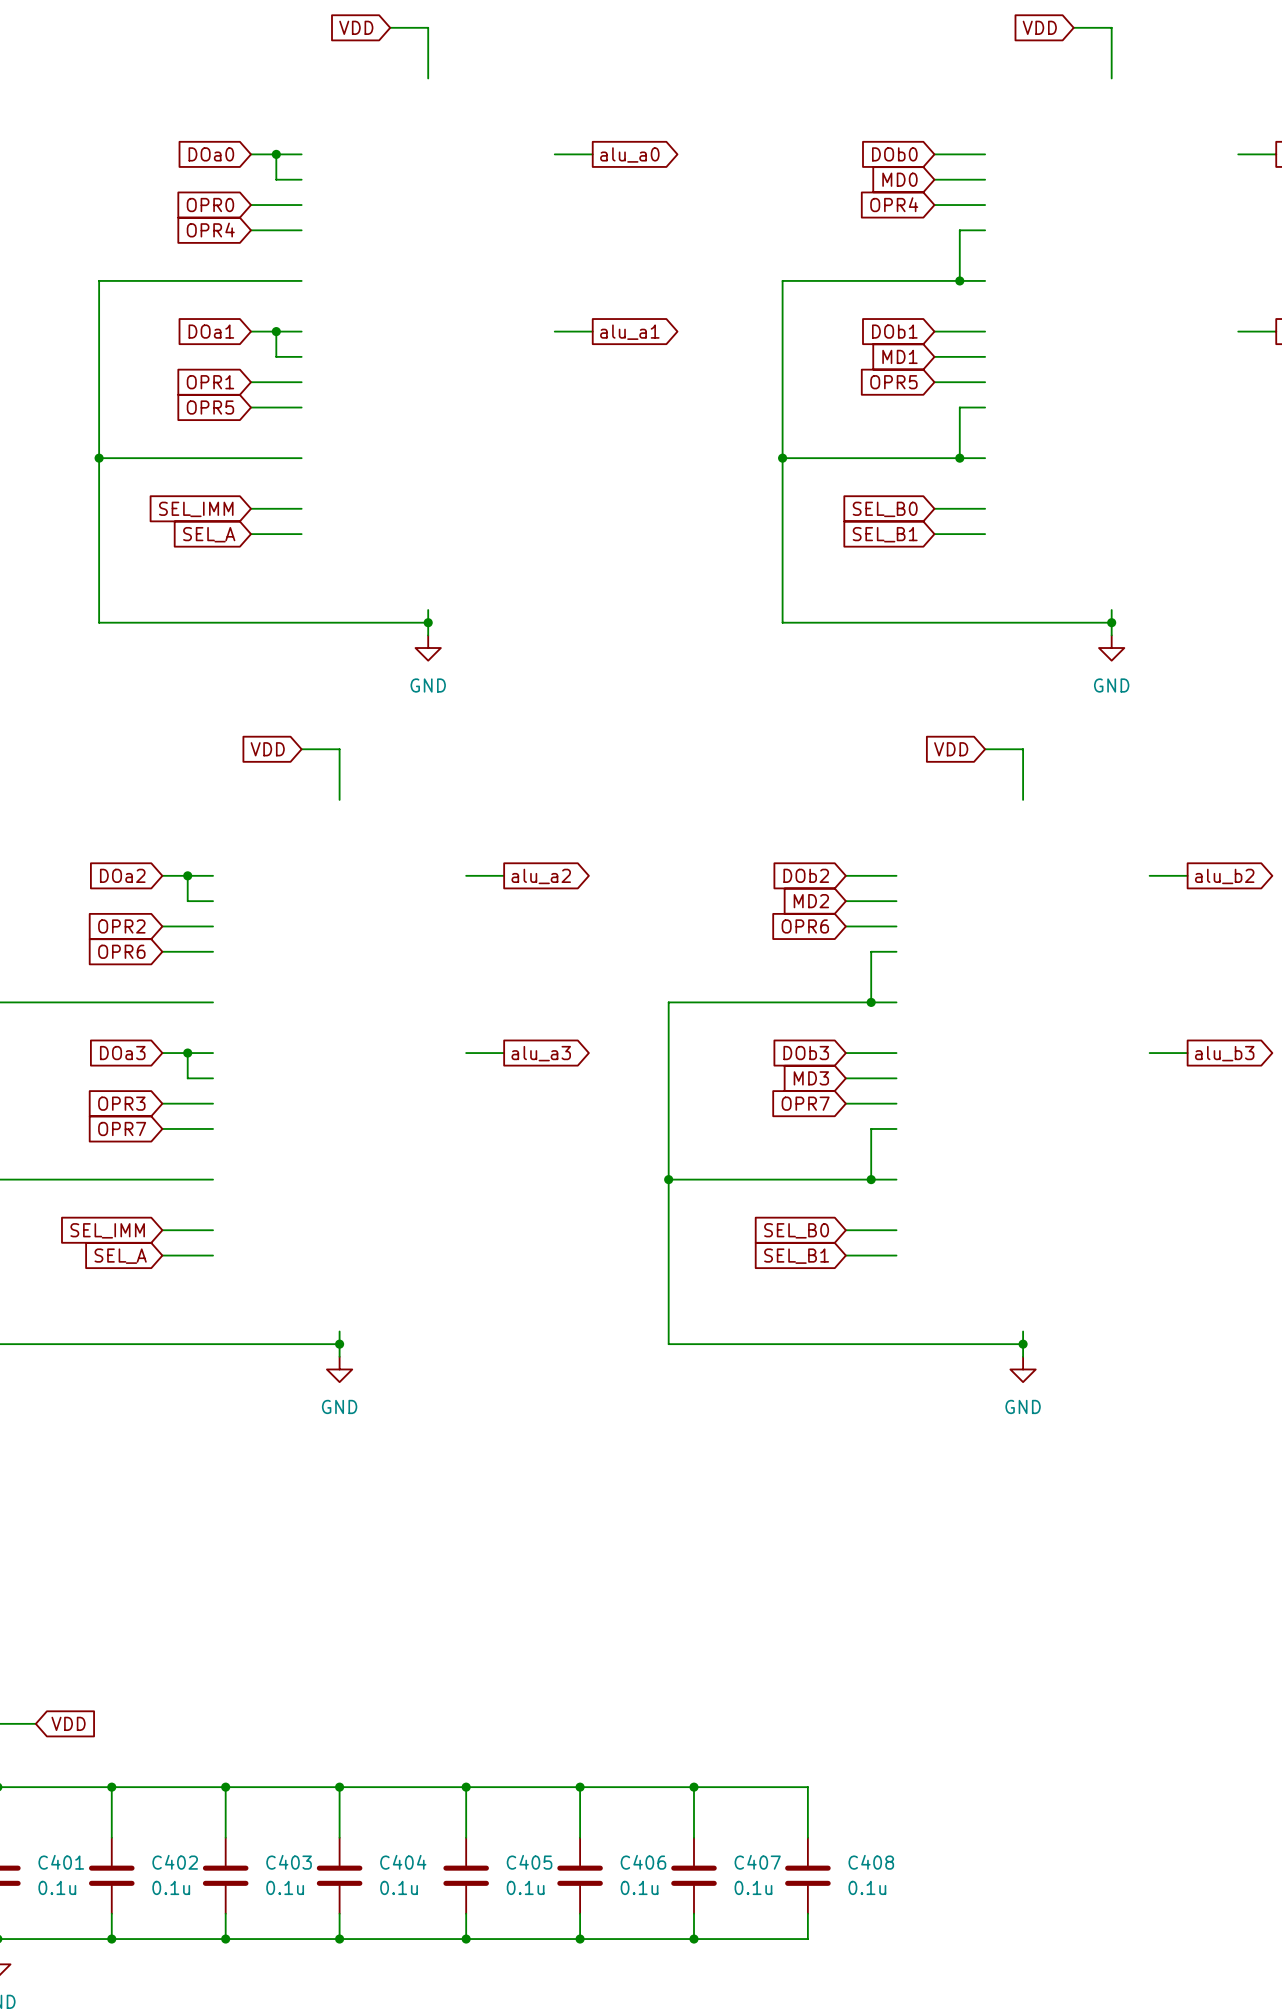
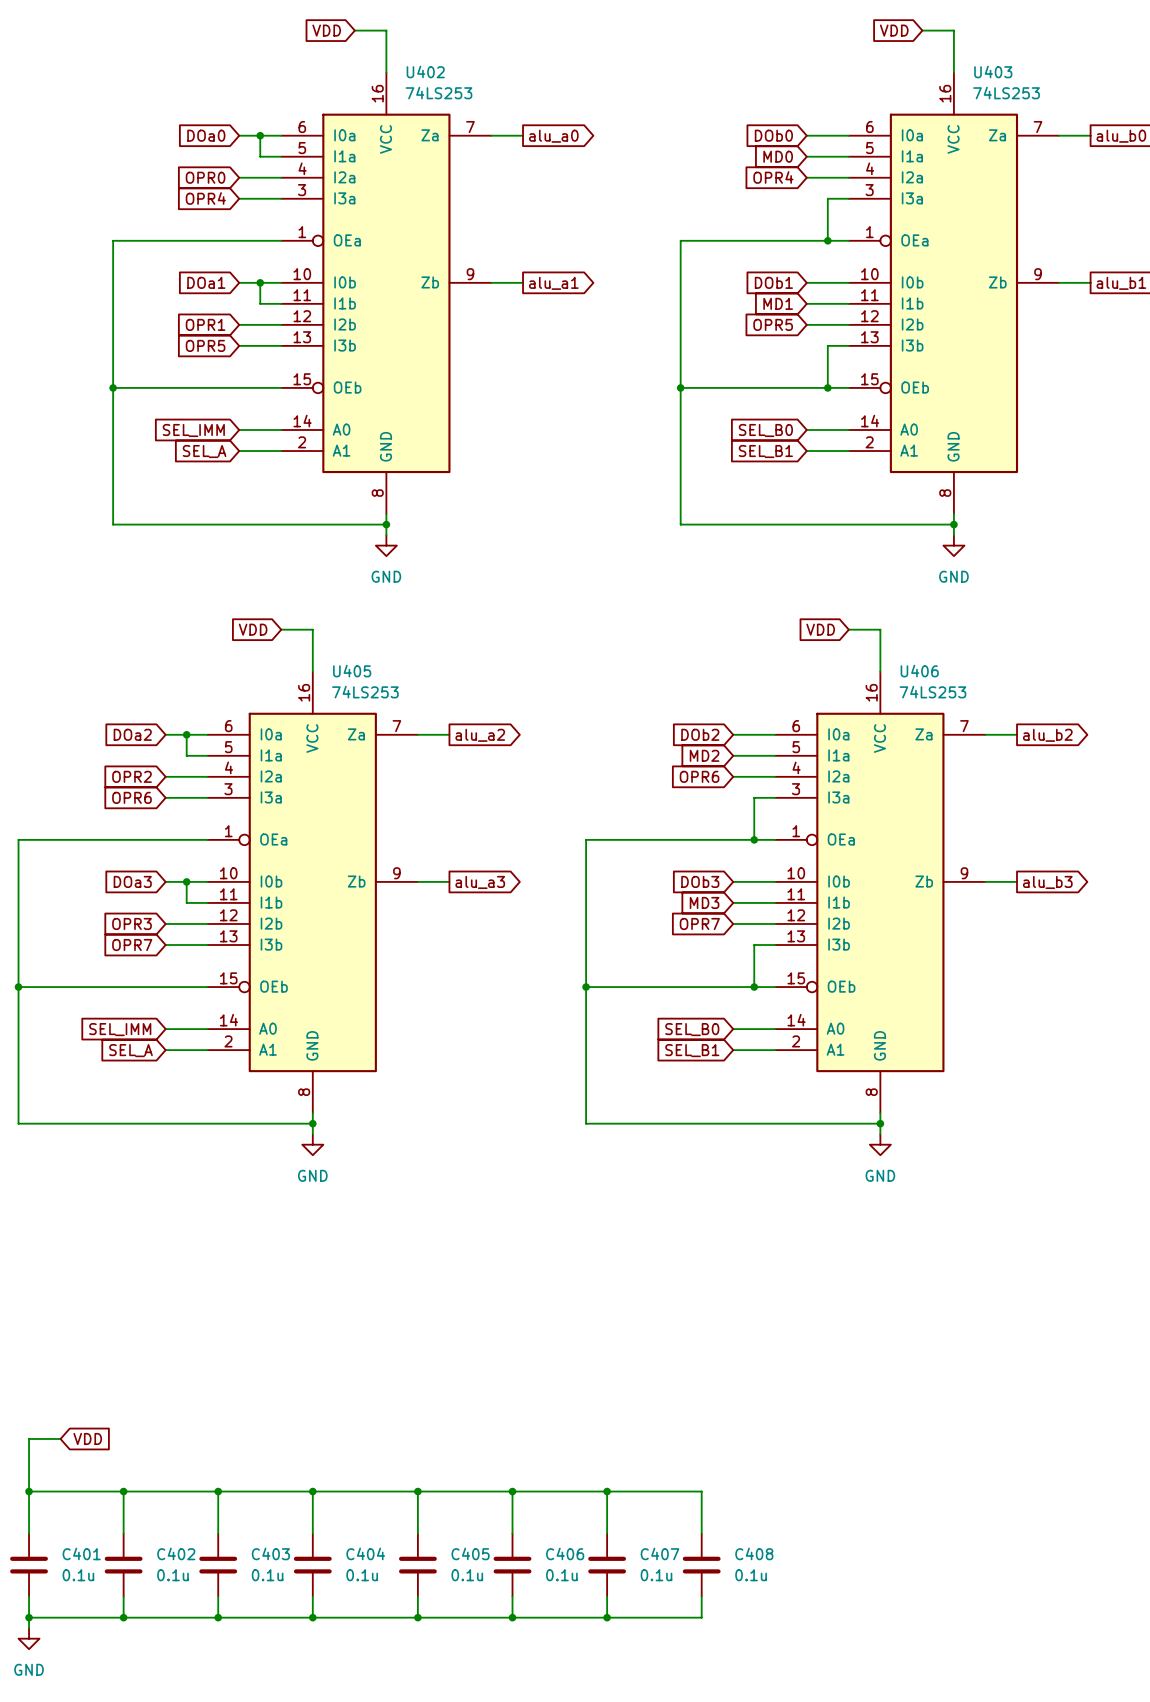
U402: none -> 74LS253 (386, 293)
U403: none -> 74LS253 (953, 293)
U405: none -> 74LS253 (312, 892)
U406: none -> 74LS253 (880, 892)

